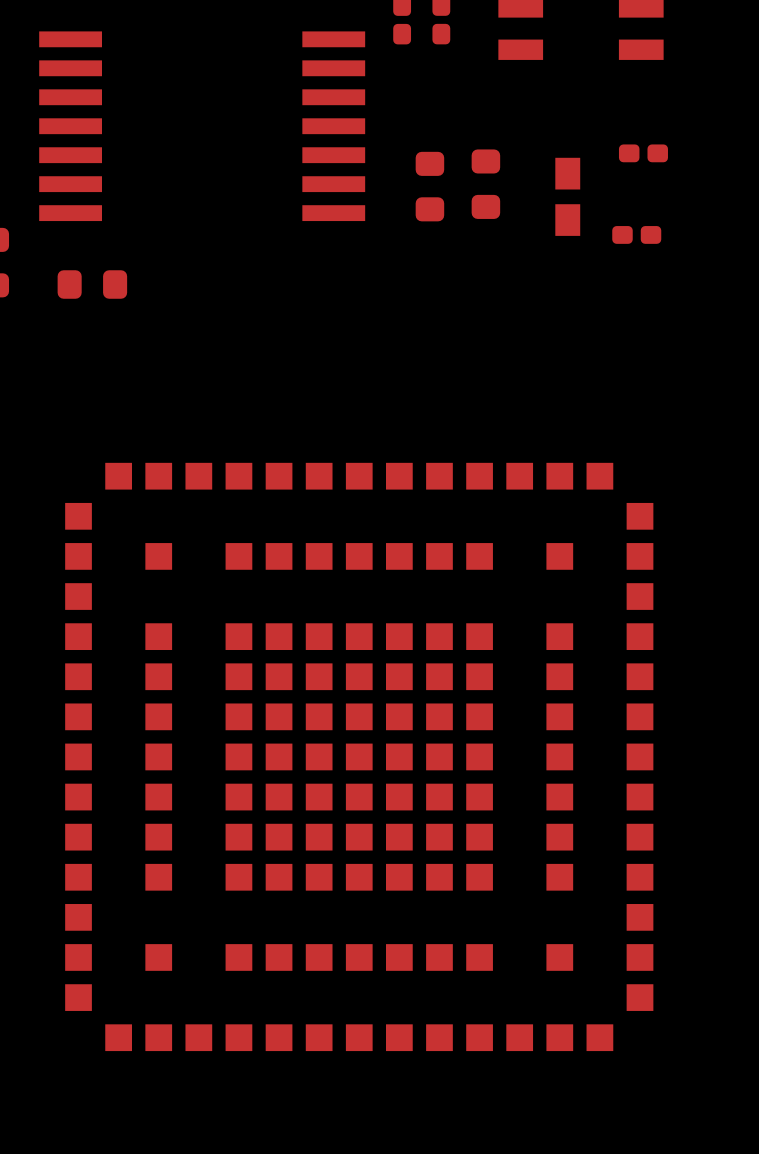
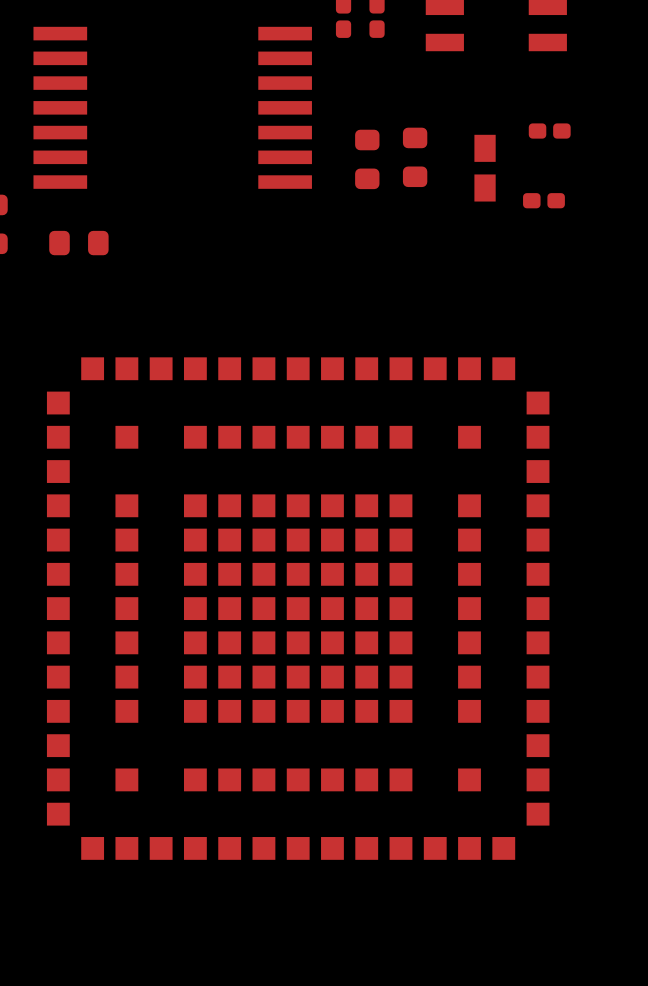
part position: (359, 756) -> (298, 608)

